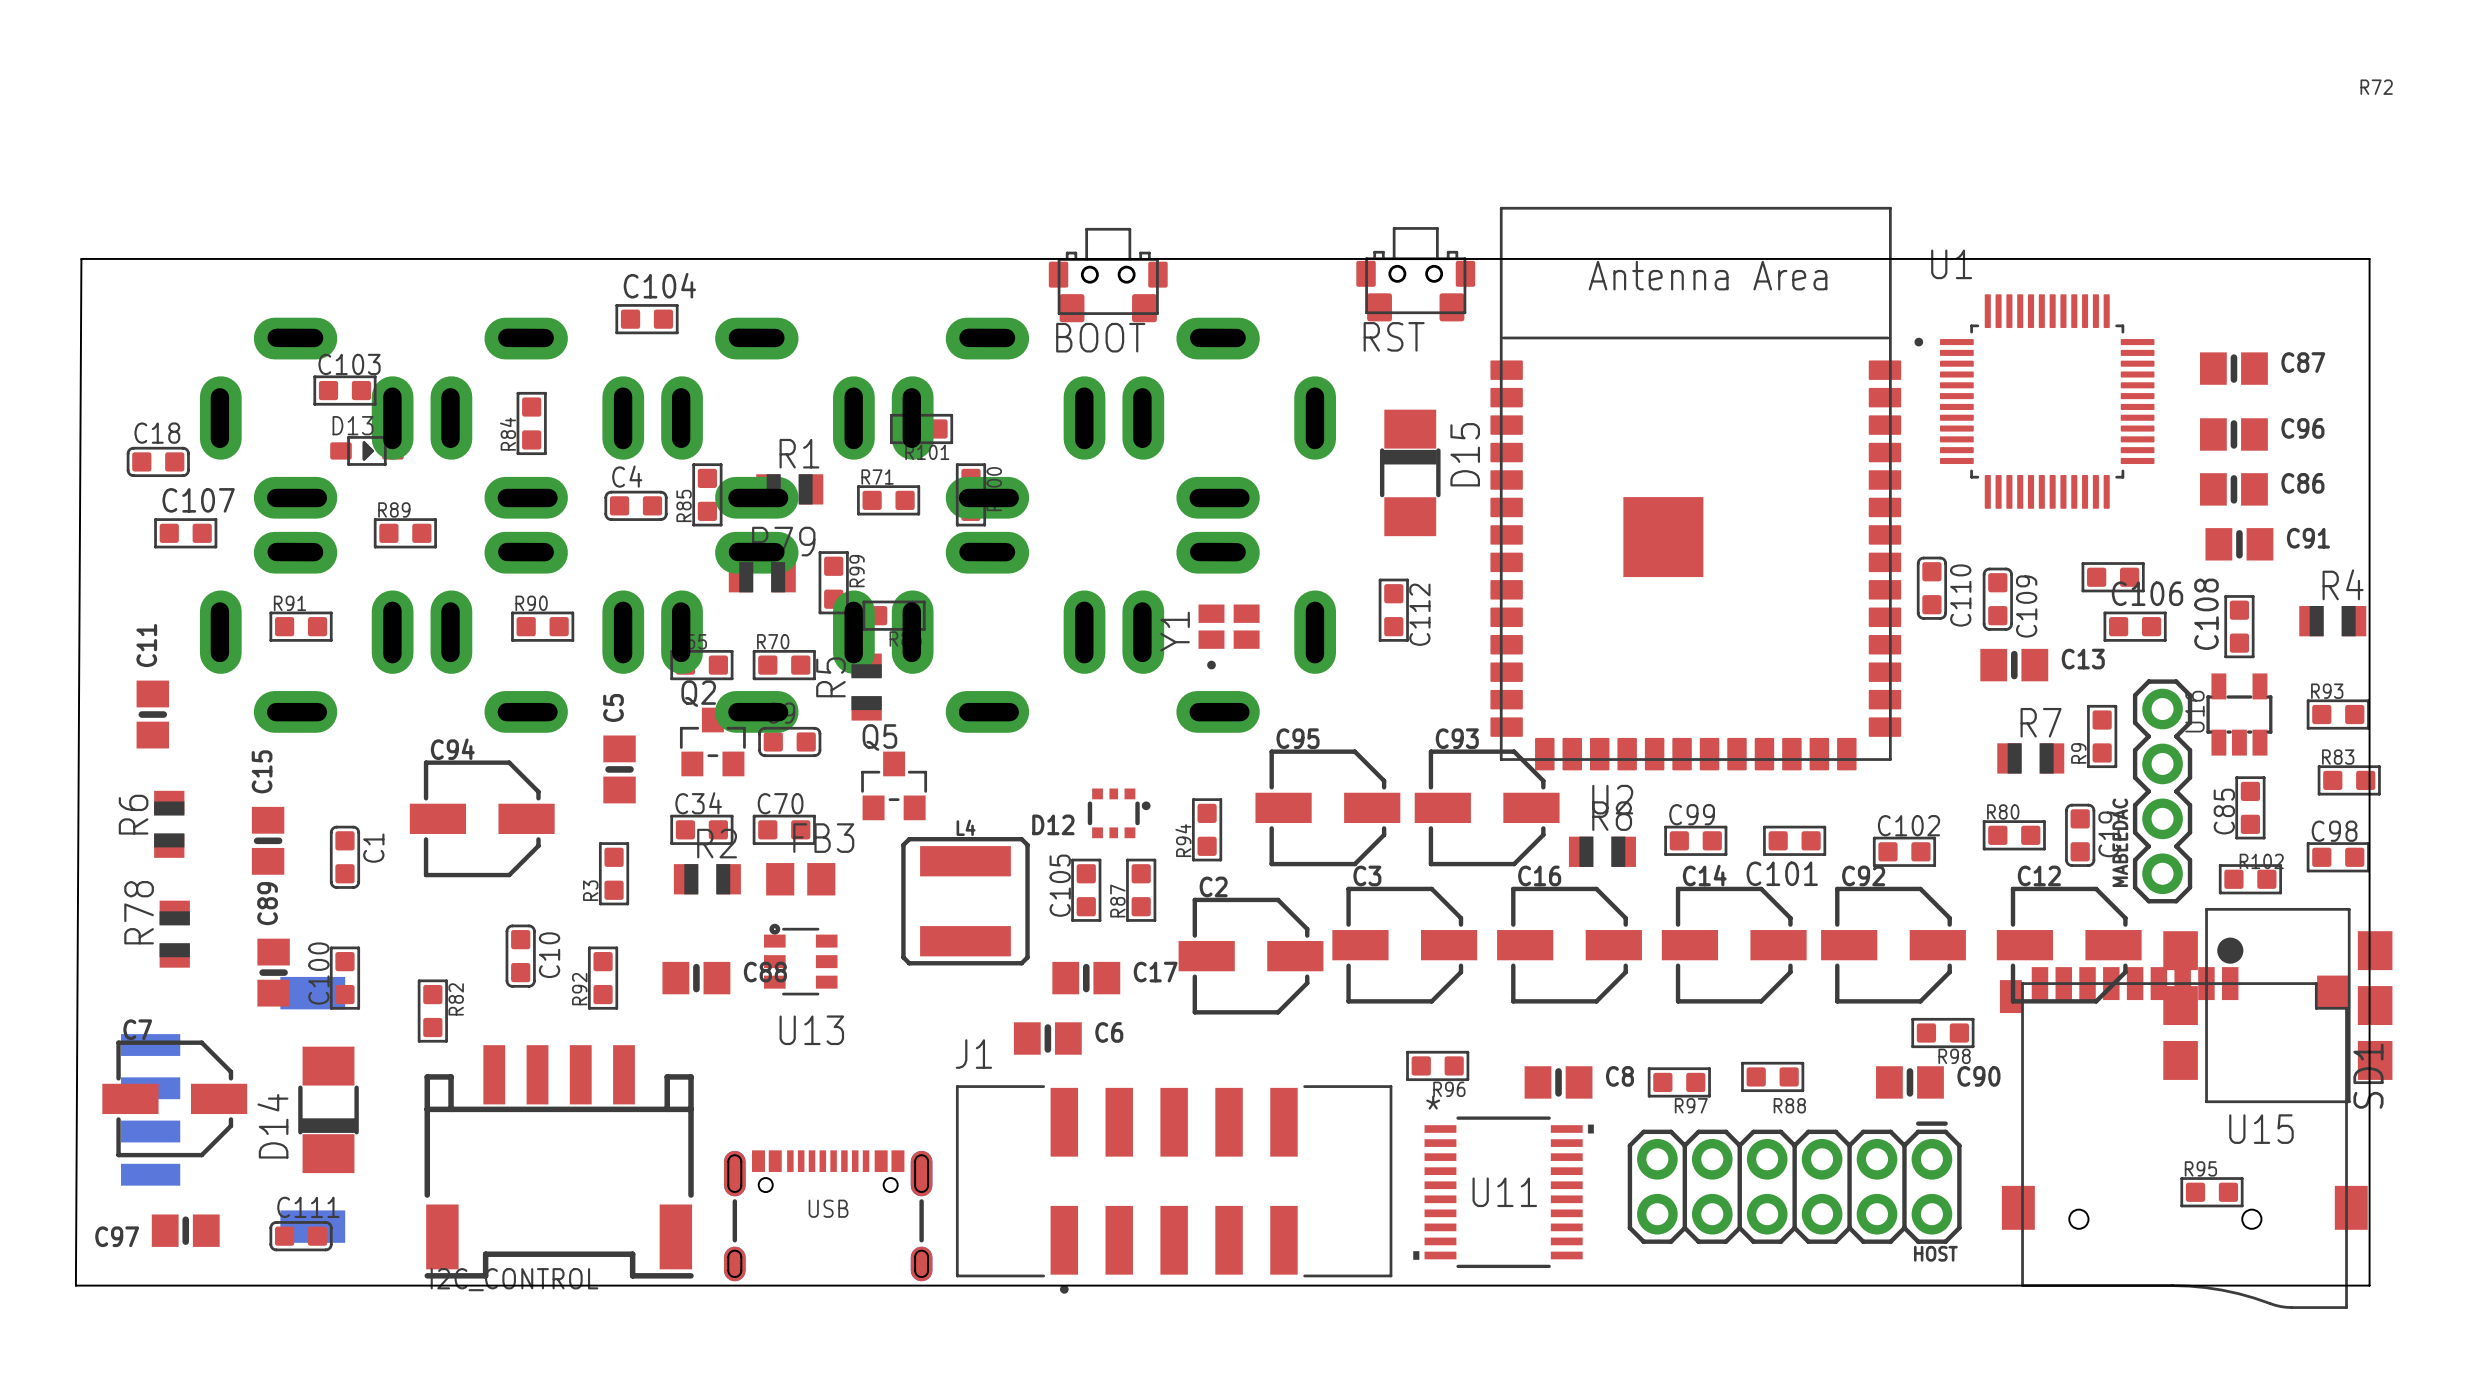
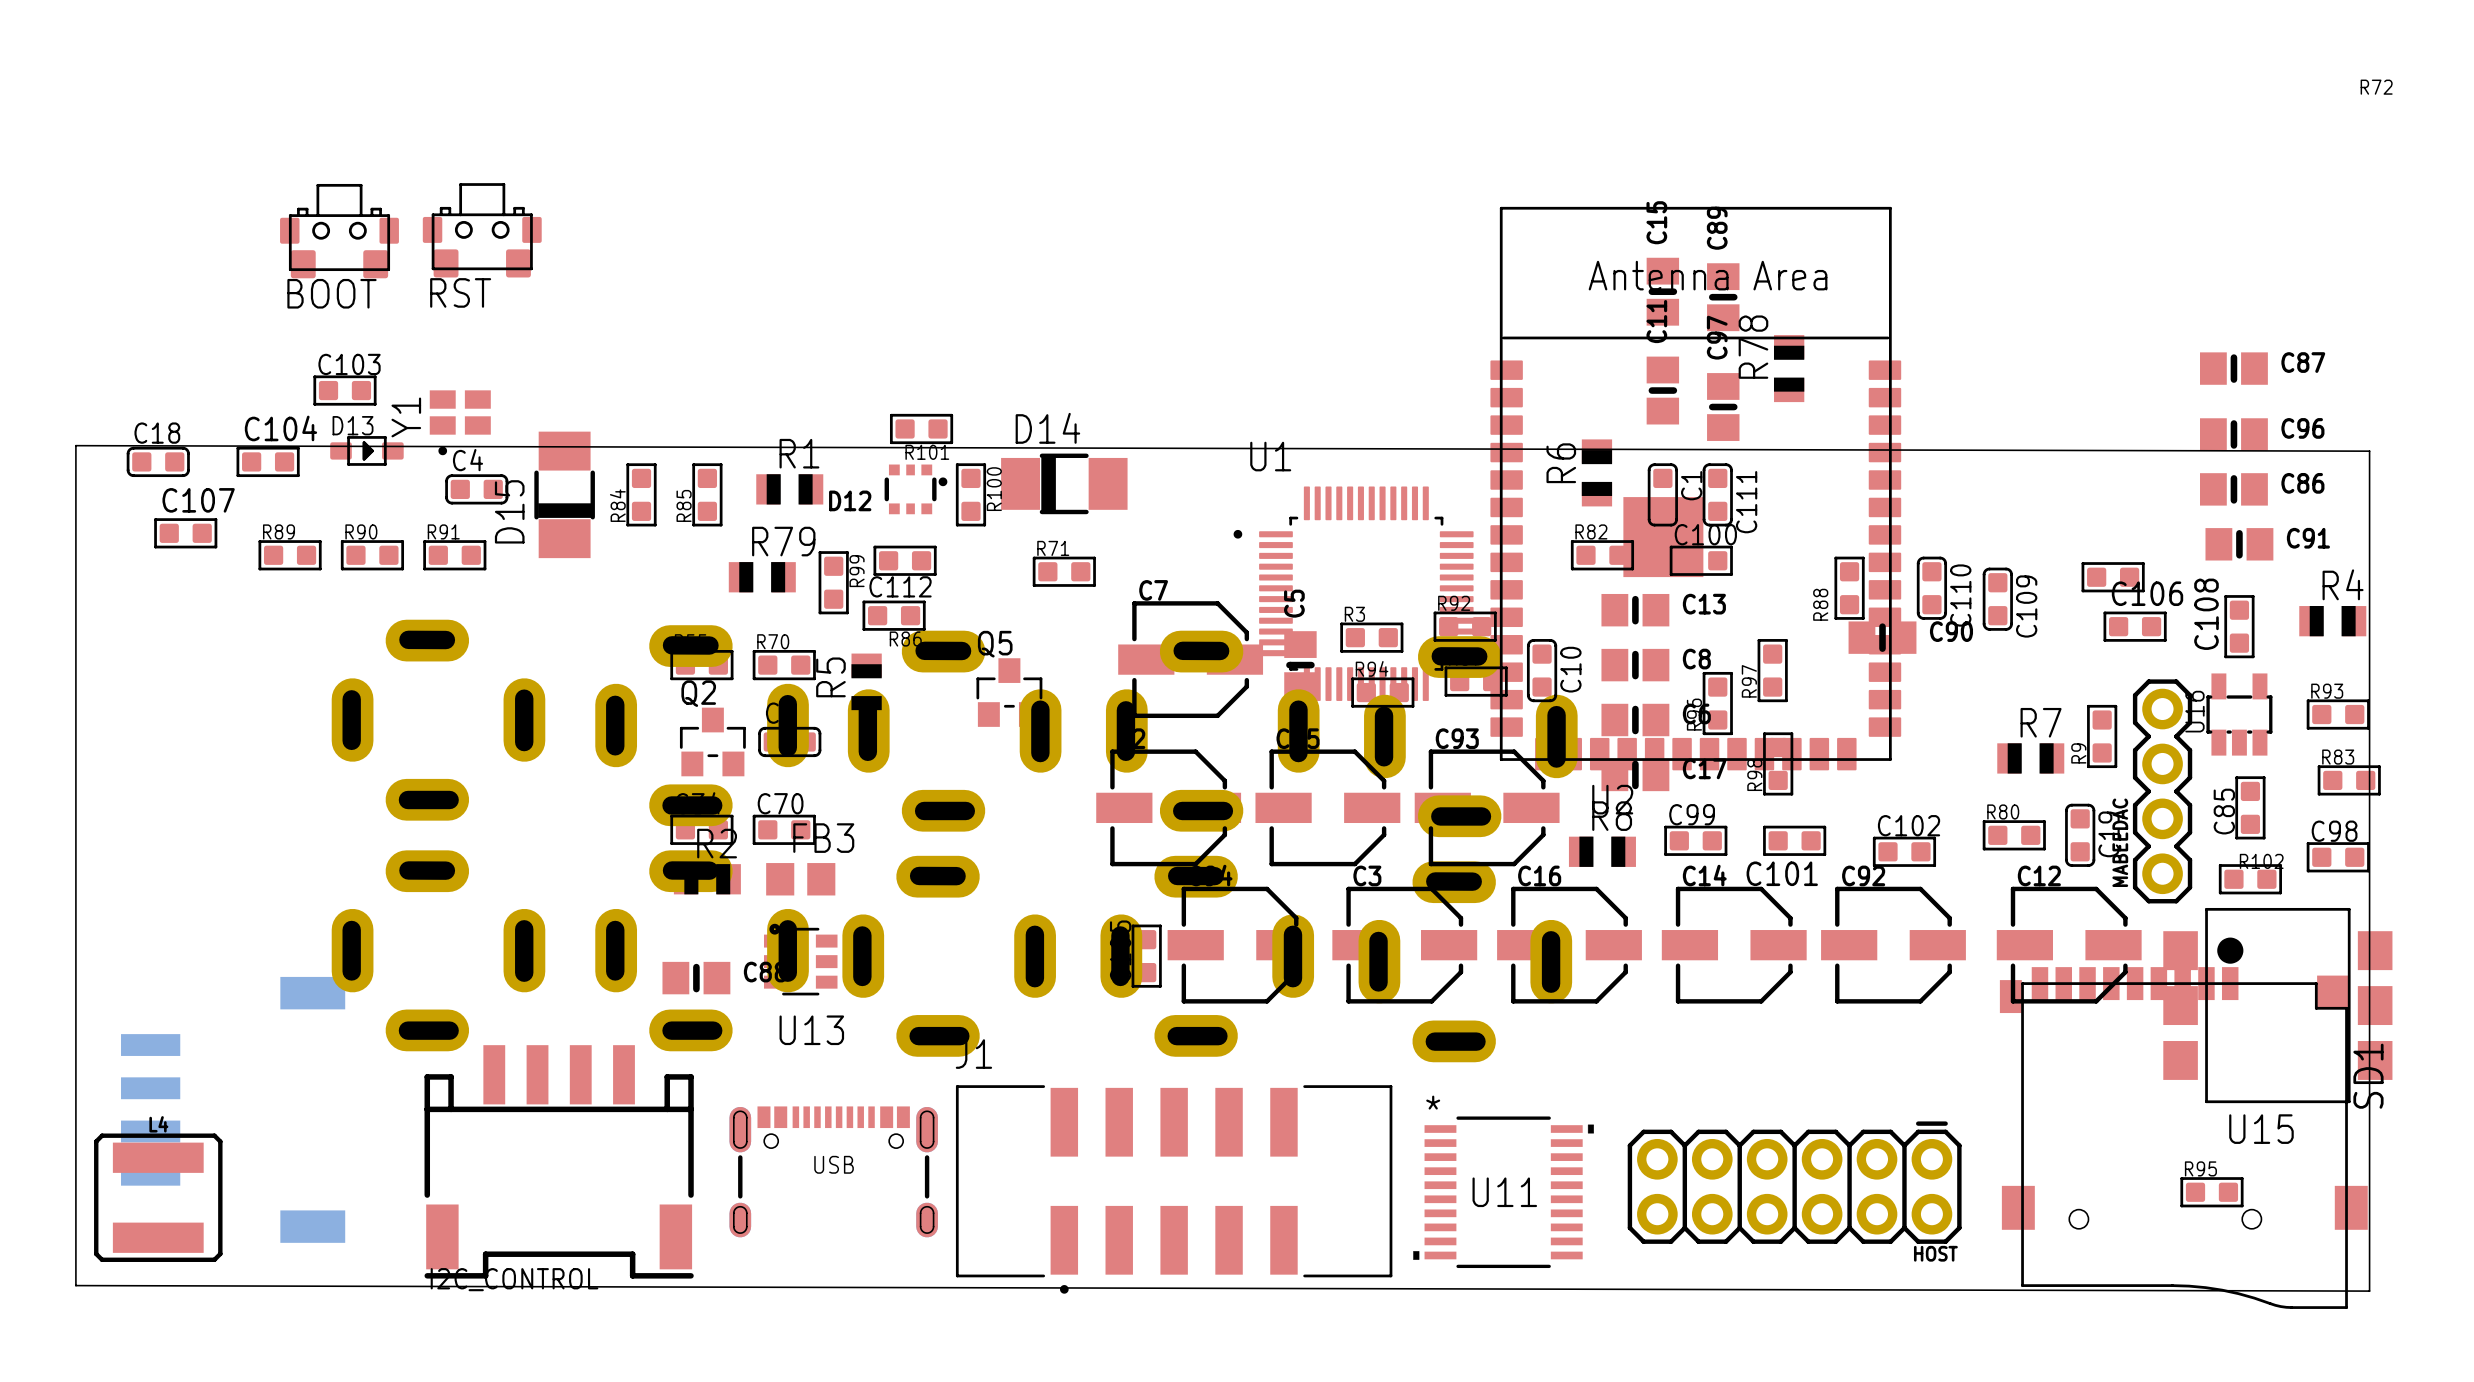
RST: none -> (482, 230)
BOOT: none -> (339, 231)
RST: (1415, 274) -> none
BOOT: (1108, 275) -> none
C104 position: (646, 319) -> (268, 461)
U1 position: (2034, 401) -> (1353, 593)
part: (306, 418) -> none
part: (537, 418) -> none
part: (767, 418) -> none
part: (998, 418) -> none
part: (1229, 418) -> none
R84 position: (531, 423) -> (641, 494)
board edge: (2369, 451) (2369, 258) (81, 258) (75, 1285) (2369, 1285) -> (2369, 451) (75, 445) (75, 1285) (2369, 1291) (2369, 1285)
D15 rotation: 0° (1410, 472) -> 180° (564, 494)
D15 position: (1410, 472) -> (564, 494)
R71 position: (888, 500) -> (1064, 571)
C4 position: (636, 505) -> (476, 489)
R89 position: (405, 533) -> (290, 555)
C112 rotation: 0° (1393, 610) -> 90° clockwise (905, 560)
C112 position: (1393, 610) -> (905, 560)
R91 position: (301, 626) -> (454, 555)
R90 position: (542, 626) -> (372, 555)
part: (306, 632) -> none
part: (537, 632) -> none
part: (767, 632) -> none
part: (998, 632) -> none
part position: (1229, 632) -> (1212, 731)
Y1 position: (1229, 636) -> (460, 422)
C13 position: (2014, 665) -> (1635, 610)
C11 position: (152, 714) -> (1662, 390)
part: none -> (438, 720)
part: none -> (702, 725)
part: none -> (954, 731)
part: none -> (1470, 736)
C5 position: (619, 769) -> (1300, 665)
Q5 position: (894, 785) -> (1009, 692)
D12 position: (1119, 813) -> (915, 489)
C94 position: (482, 818) -> (1240, 945)
R6 position: (169, 824) -> (1596, 472)
R94 rotation: 0° (1207, 829) -> 90° clockwise (1382, 692)
R94 position: (1207, 829) -> (1382, 692)
C15 position: (268, 840) -> (1662, 291)
C1 position: (344, 857) -> (1662, 494)
R3 rotation: 0° (614, 873) -> 90° clockwise (1371, 637)
R3 position: (614, 873) -> (1371, 637)
C105 position: (1086, 890) -> (1146, 956)
R87 rotation: 0° (1141, 890) -> 90° clockwise (1476, 681)
R87 position: (1141, 890) -> (1476, 681)
L4 position: (965, 901) -> (158, 1197)
R78 position: (174, 934) -> (1789, 368)
part: none -> (438, 950)
part: none -> (702, 950)
C10 position: (520, 956) -> (1542, 670)
part: none -> (949, 956)
part: none -> (1207, 956)
C2 position: (1251, 956) -> (1168, 807)
part: none -> (1465, 961)
C89 position: (273, 972) -> (1723, 297)
C100 rotation: 0° (344, 978) -> 90° clockwise (1701, 560)
C100 position: (344, 978) -> (1701, 560)
R92 rotation: 0° (603, 978) -> 90° clockwise (1465, 626)
R92 position: (603, 978) -> (1465, 626)
C17 position: (1086, 978) -> (1635, 774)
R82 rotation: 0° (432, 1011) -> 90° clockwise (1602, 555)
R82 position: (432, 1011) -> (1602, 555)
R98 rotation: 0° (1942, 1033) -> 90° clockwise (1778, 763)
R98 position: (1942, 1033) -> (1778, 763)
C6 position: (1047, 1038) -> (1635, 720)
R96 rotation: 0° (1437, 1065) -> 90° clockwise (1717, 703)
R96 position: (1437, 1065) -> (1717, 703)
R88 rotation: 0° (1772, 1076) -> 90° clockwise (1849, 588)
R88 position: (1772, 1076) -> (1849, 588)
C8 position: (1558, 1082) -> (1635, 665)
R97 rotation: 0° (1679, 1082) -> 90° clockwise (1772, 670)
R97 position: (1679, 1082) -> (1772, 670)
C90 position: (1909, 1082) -> (1882, 637)
C7 position: (174, 1098) -> (1190, 659)
D14 rotation: 0° (328, 1109) -> 90° clockwise (1064, 483)
D14 position: (328, 1109) -> (1064, 483)
USB position: (828, 1215) -> (833, 1171)
C97 rotation: 0° (185, 1230) -> 90° clockwise (1723, 407)
C97 position: (185, 1230) -> (1723, 407)
C111 rotation: 0° (301, 1236) -> 90° clockwise (1717, 494)
C111 position: (301, 1236) -> (1717, 494)

